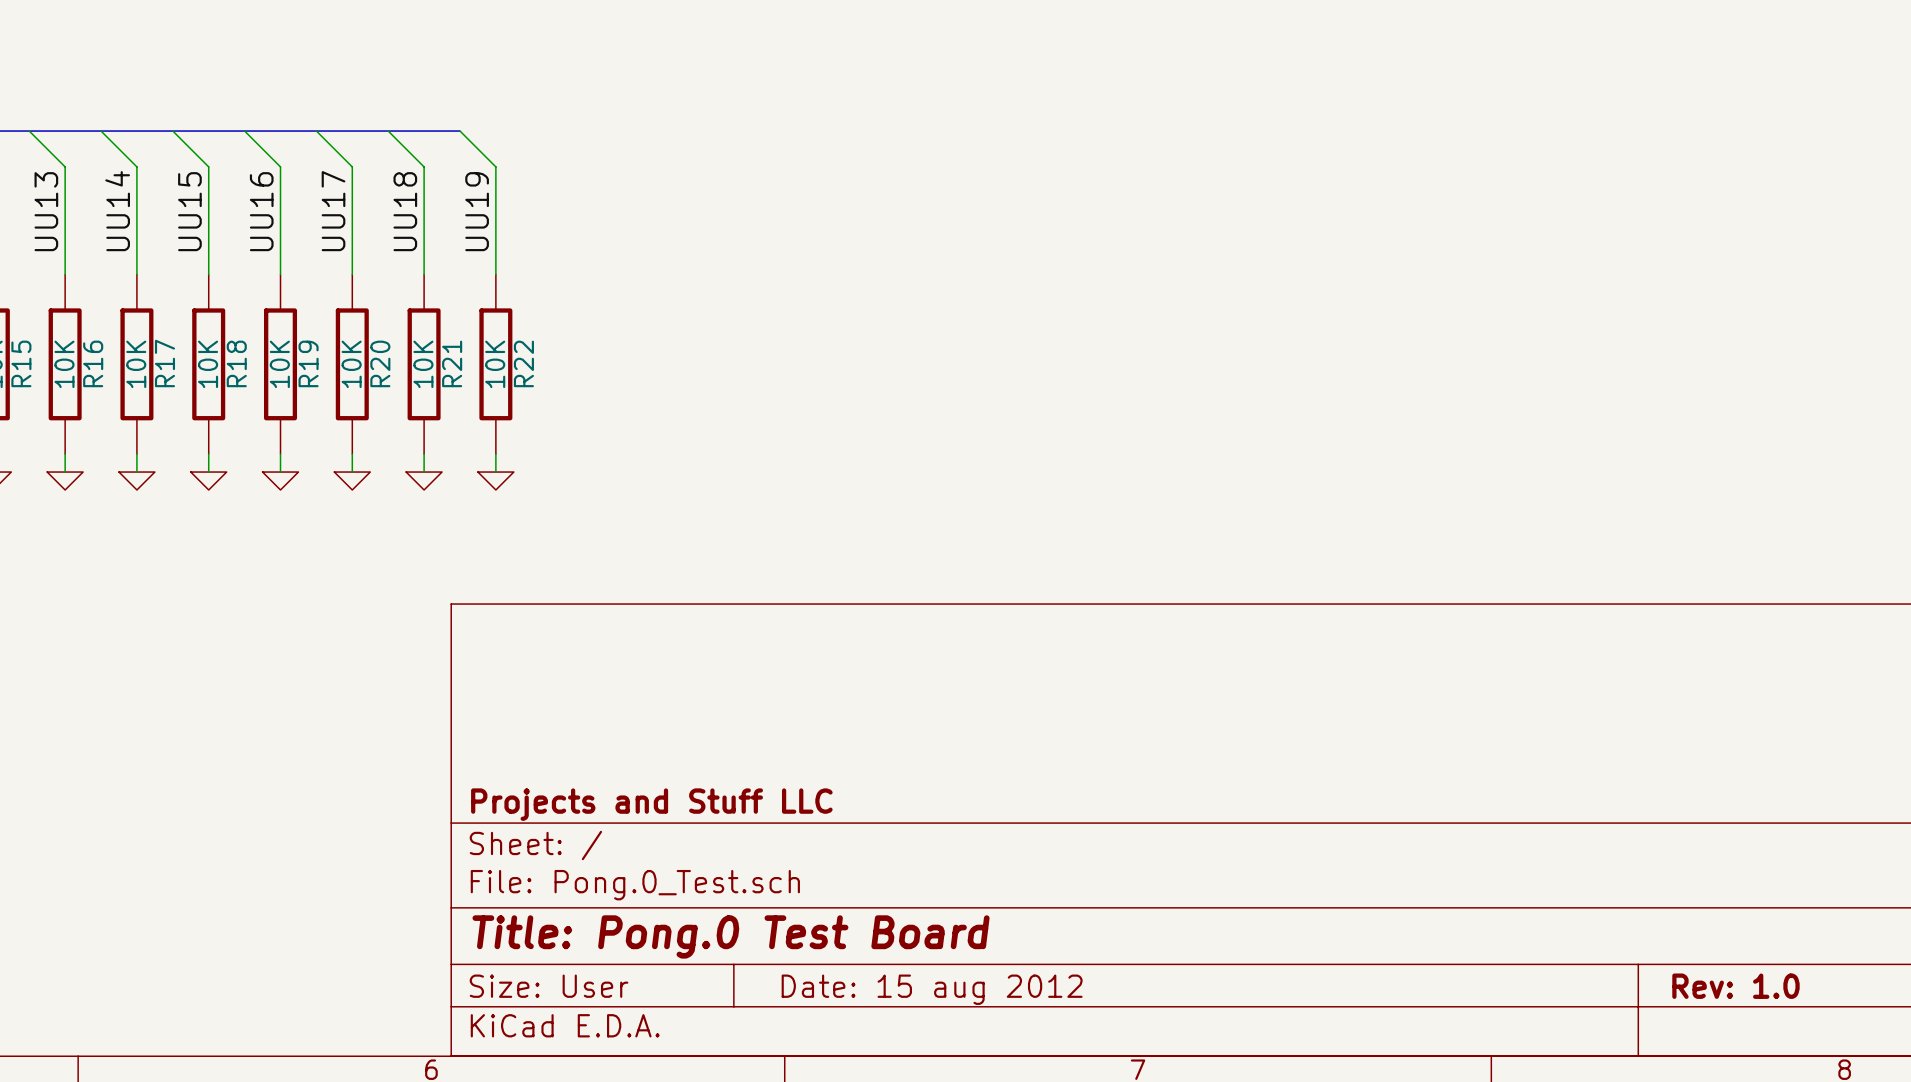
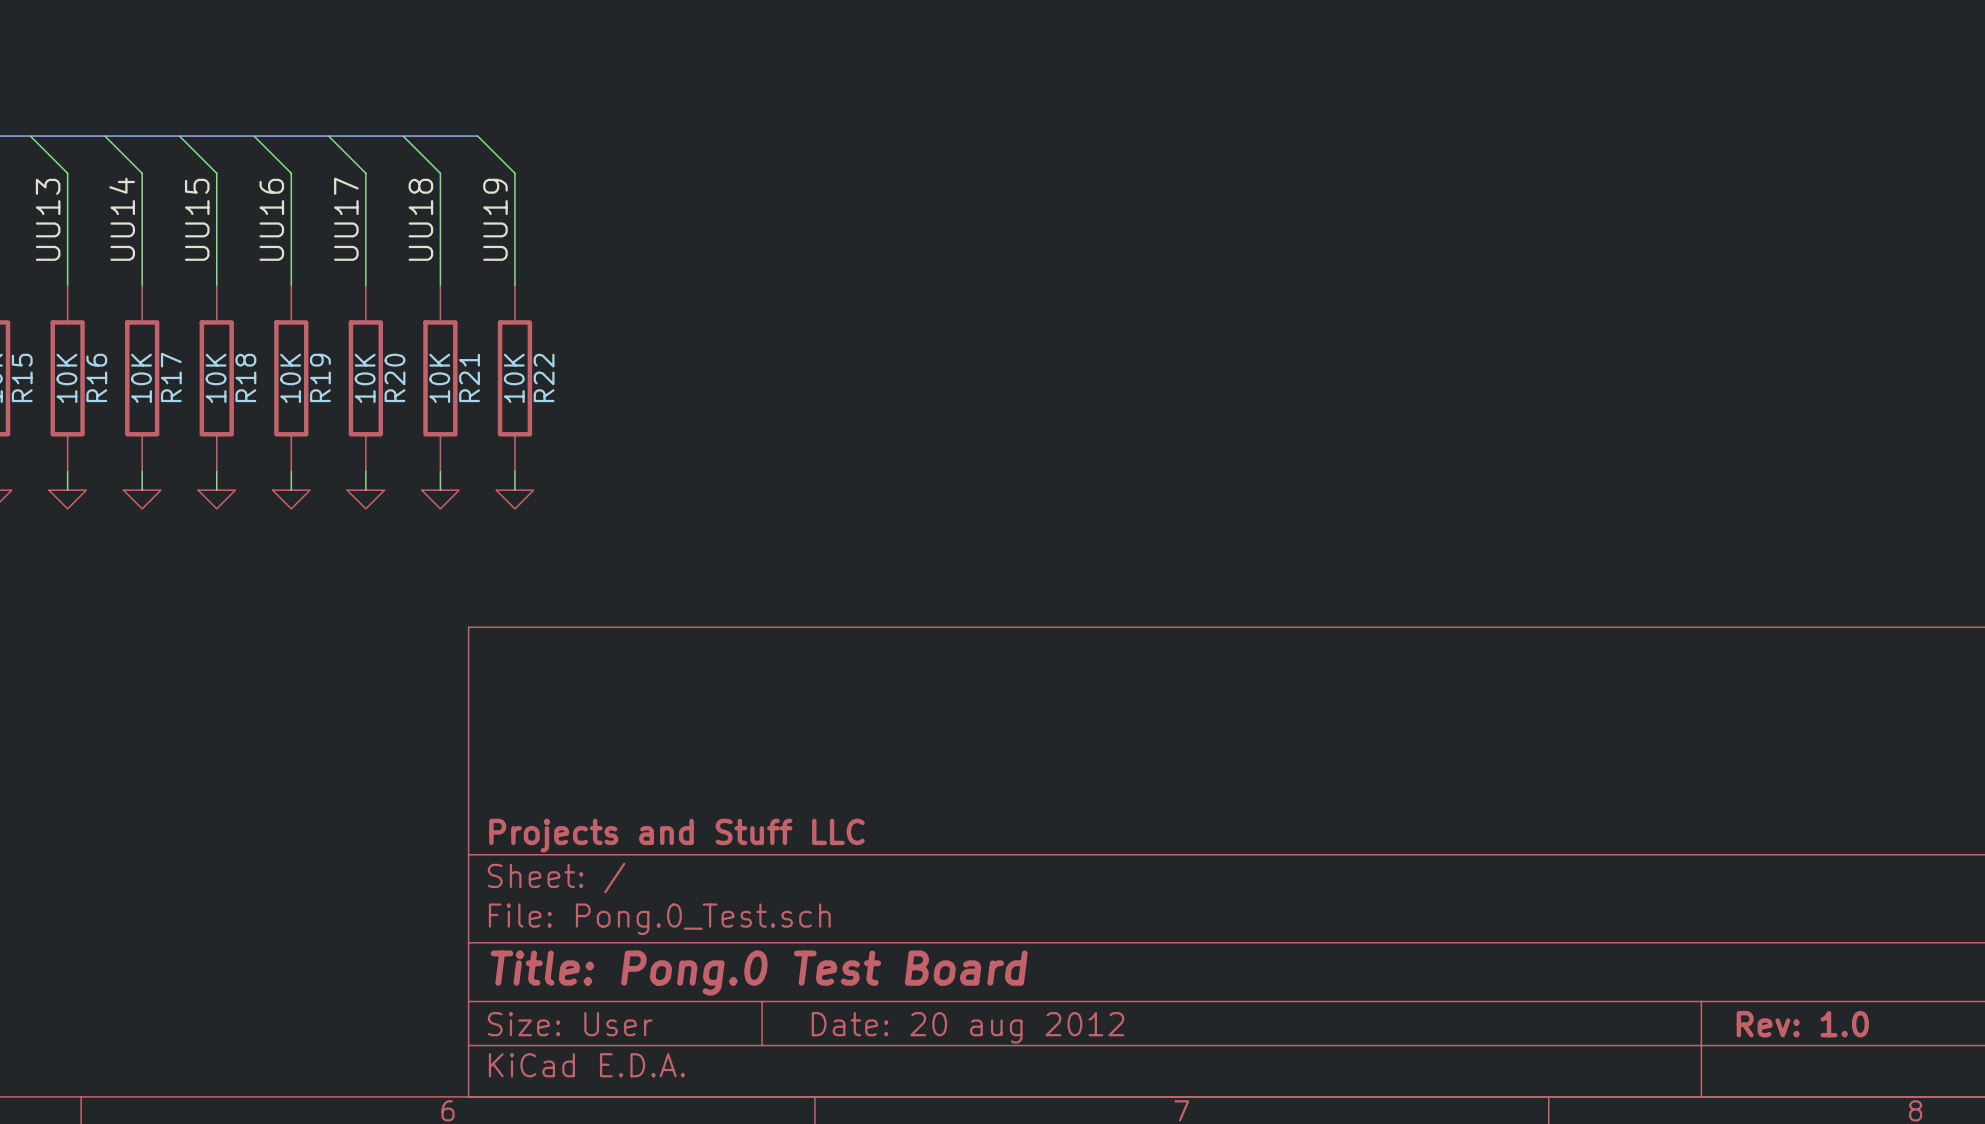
title block: Date: 15 aug 2012 (932, 989) -> Date: 20 aug 2012 (967, 1027)

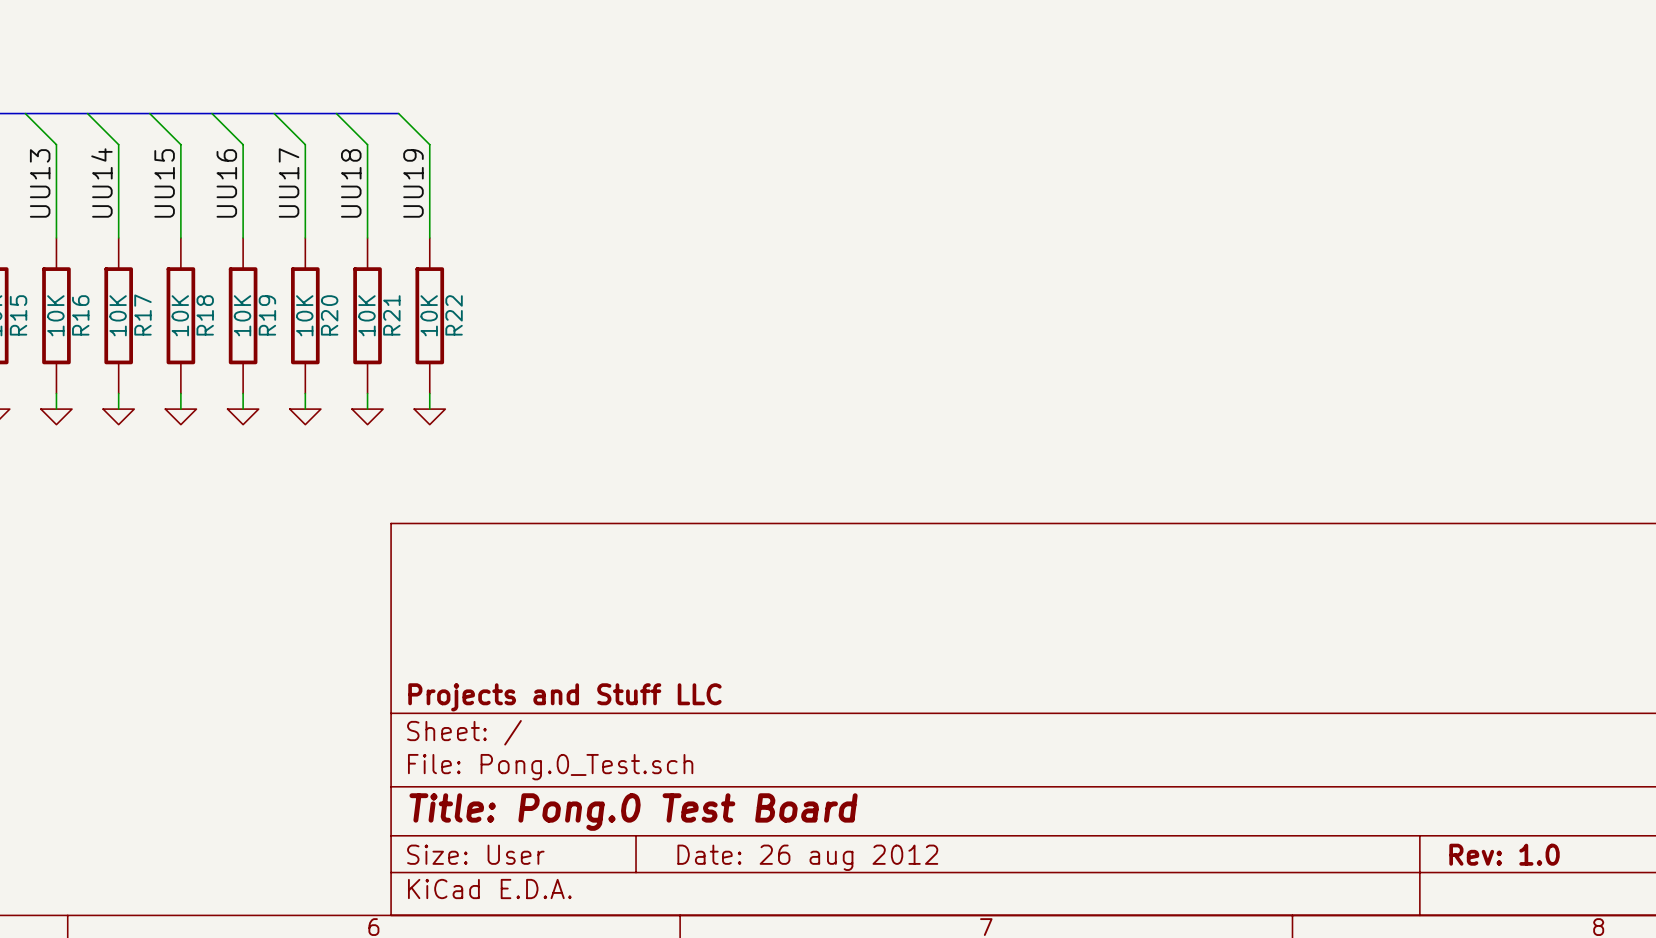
title block: Date: 20 aug 2012 (967, 1027) -> Date: 26 aug 2012 (807, 857)

